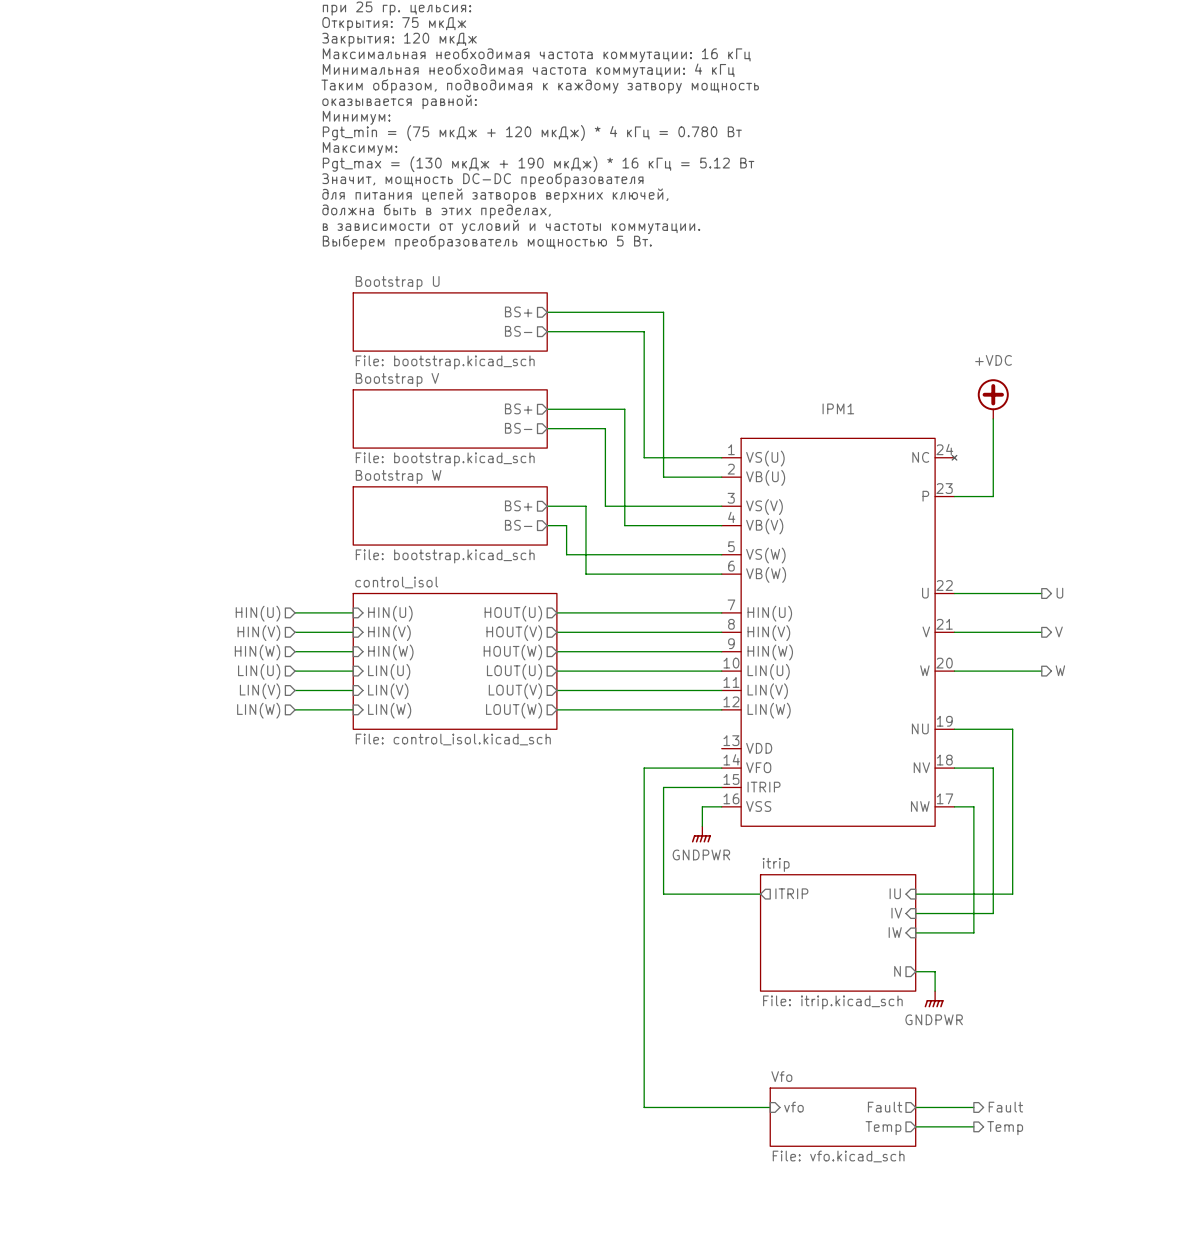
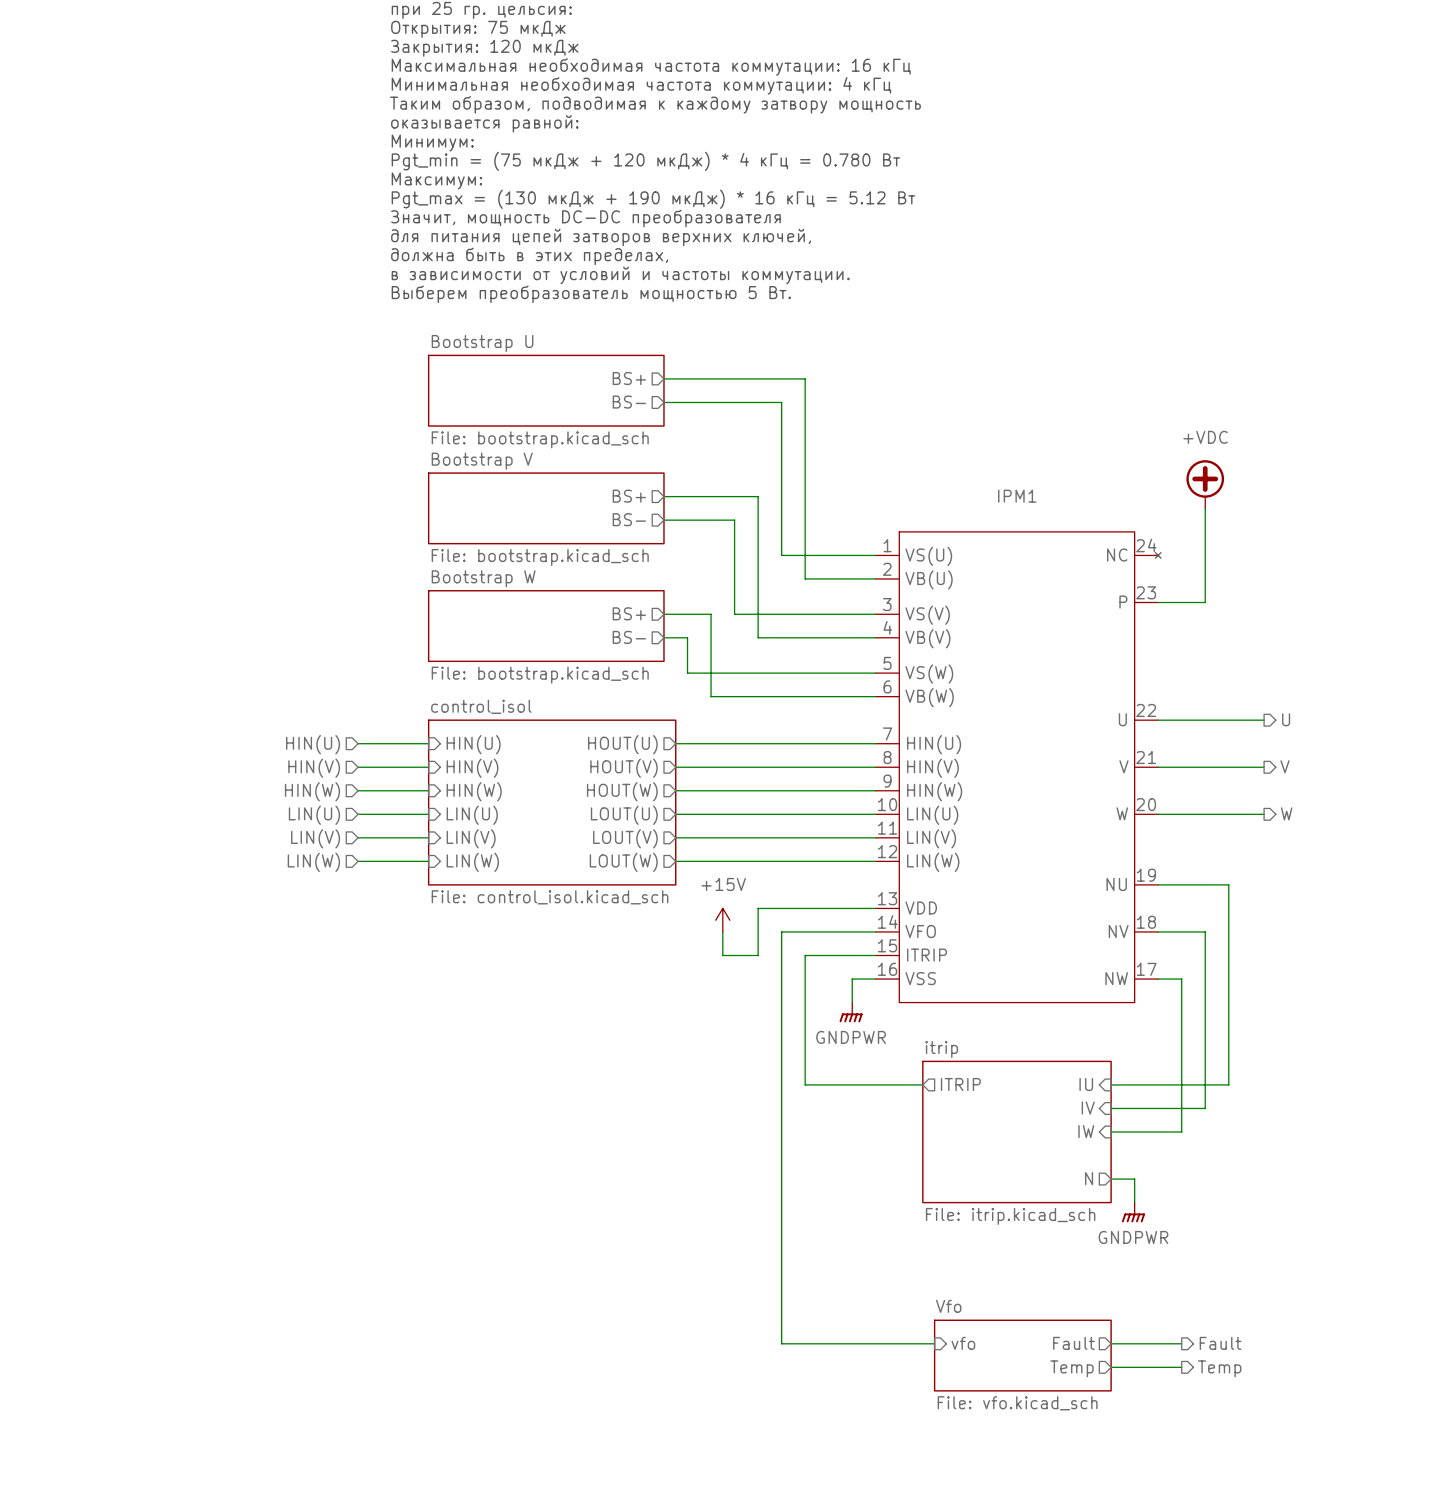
wire: none -> (875, 908) (758, 908) (758, 955) (722, 955) (722, 931)
power symbol: none -> +15V (722, 920)

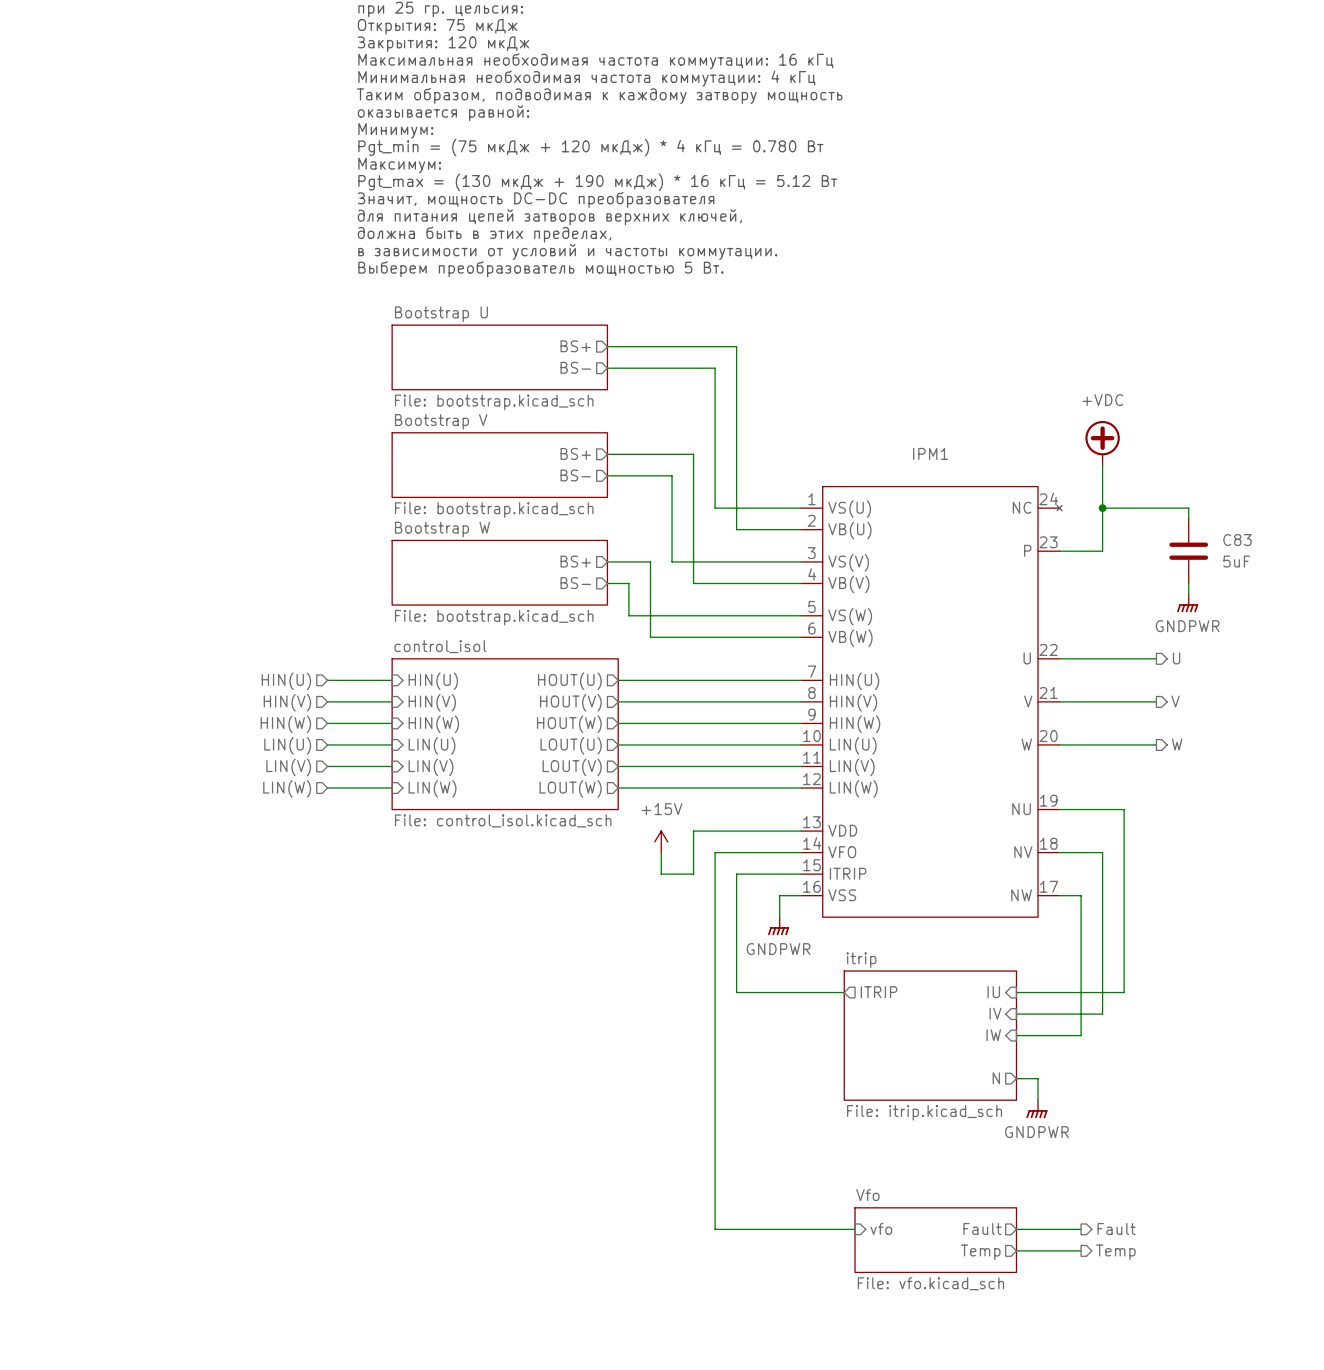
wire: none -> (1102, 508) (1188, 508) (1188, 518)
junction: none -> (1102, 508)
C83: none -> 5uF (1188, 551)
wire: none -> (1188, 583) (1188, 594)
power symbol: none -> GNDPWR (1187, 603)

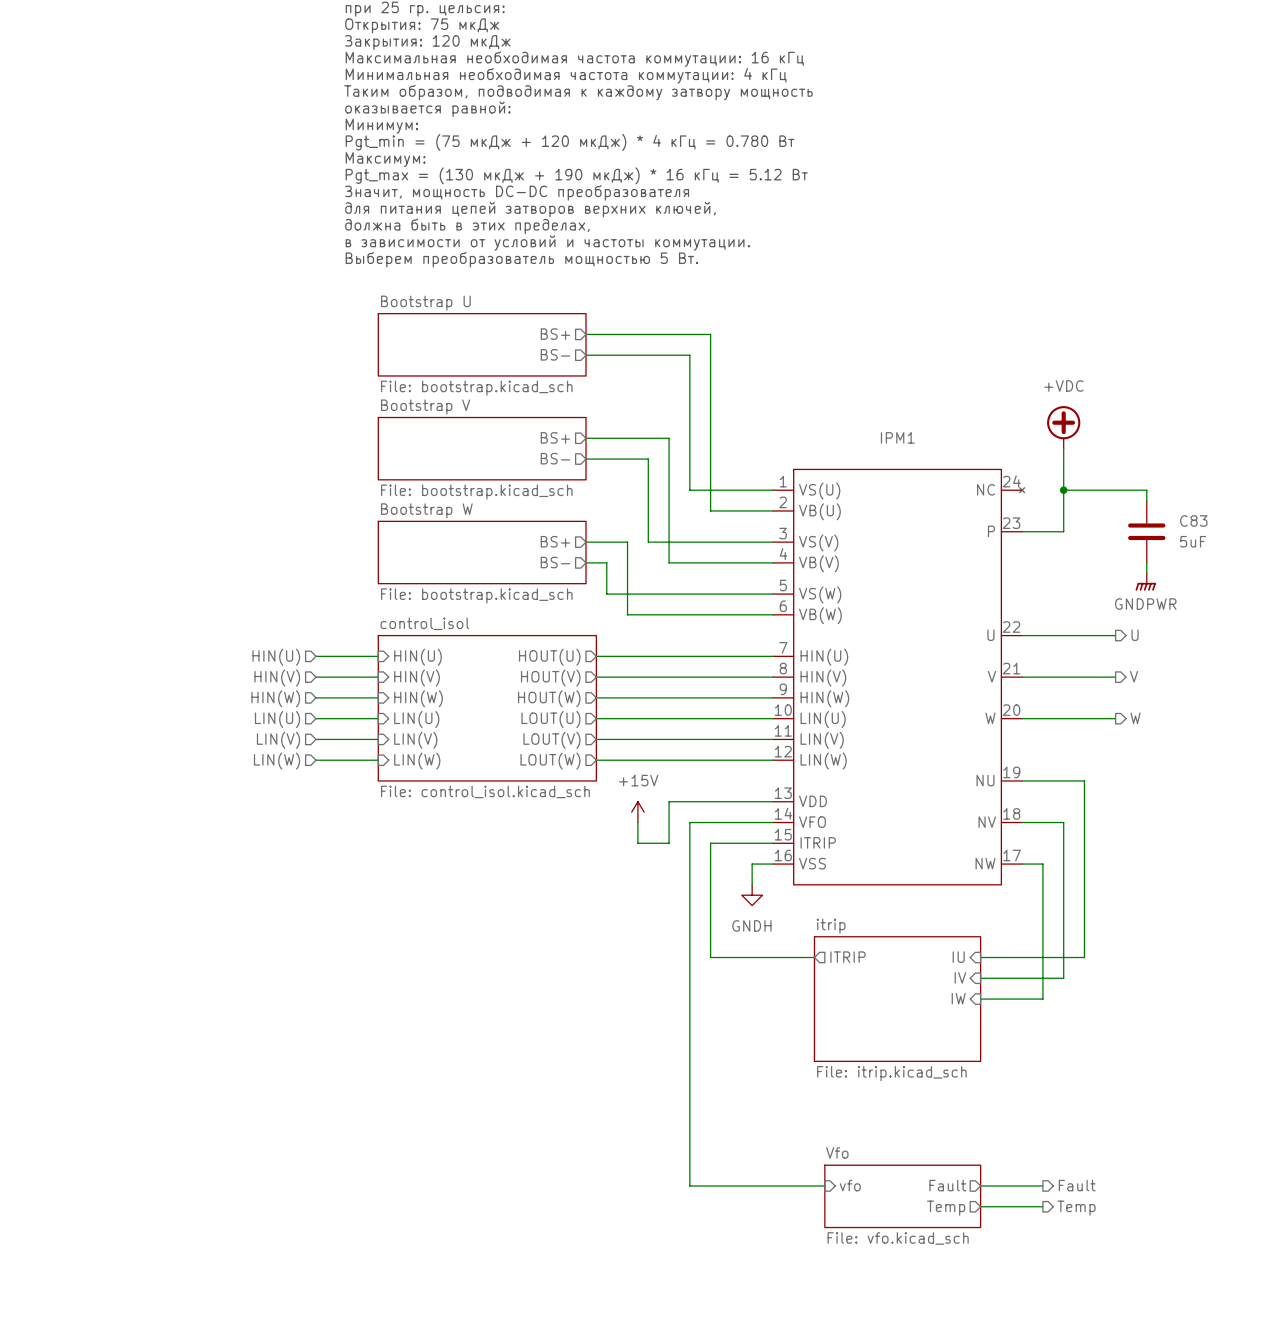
power symbol: GNDPWR (778, 926) -> GNDH (752, 895)
sheet pin: N (996, 1078) -> none
wire: (1016, 1078) (1038, 1078) (1038, 1100) -> none
power symbol: GNDPWR (1036, 1109) -> none

